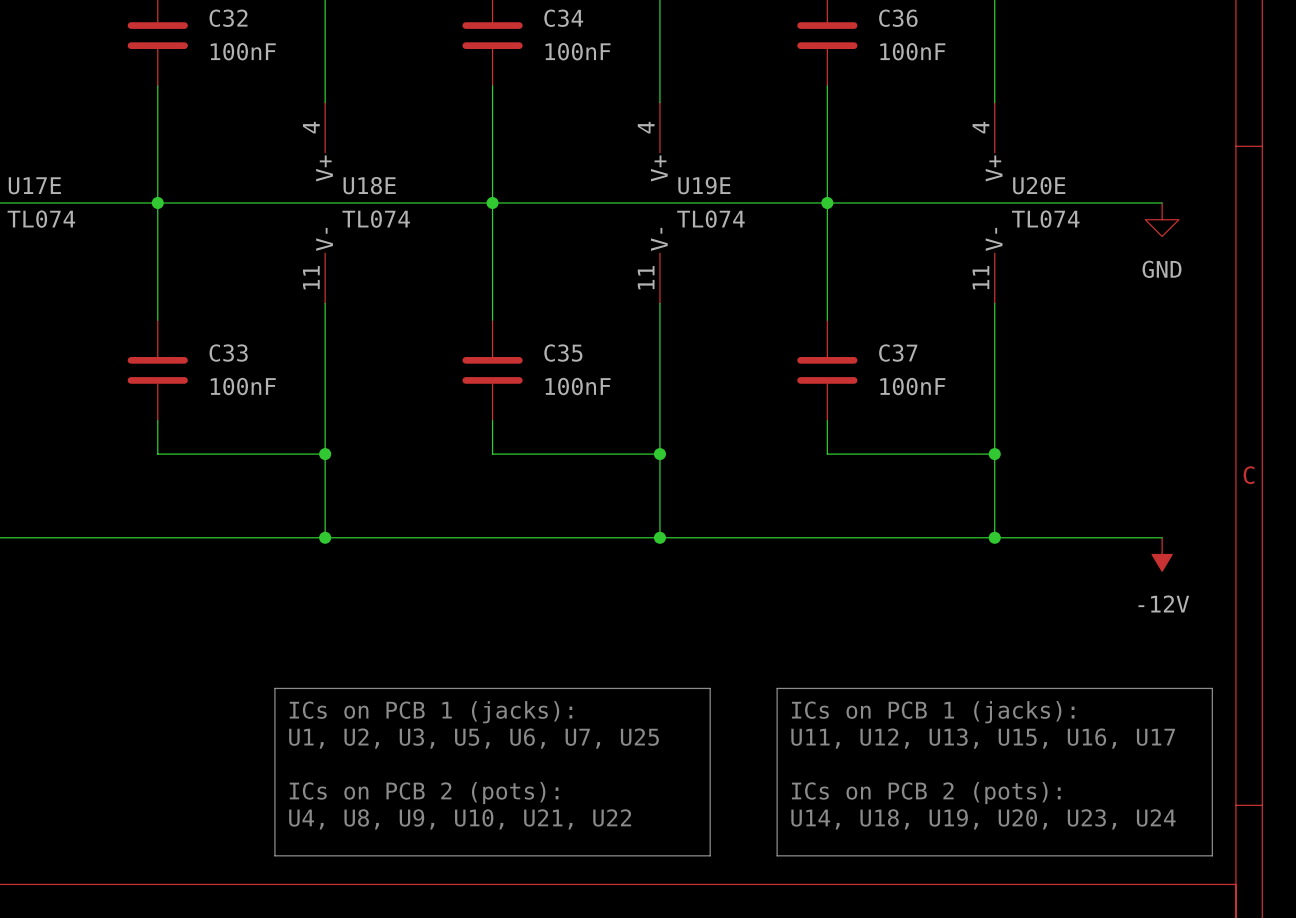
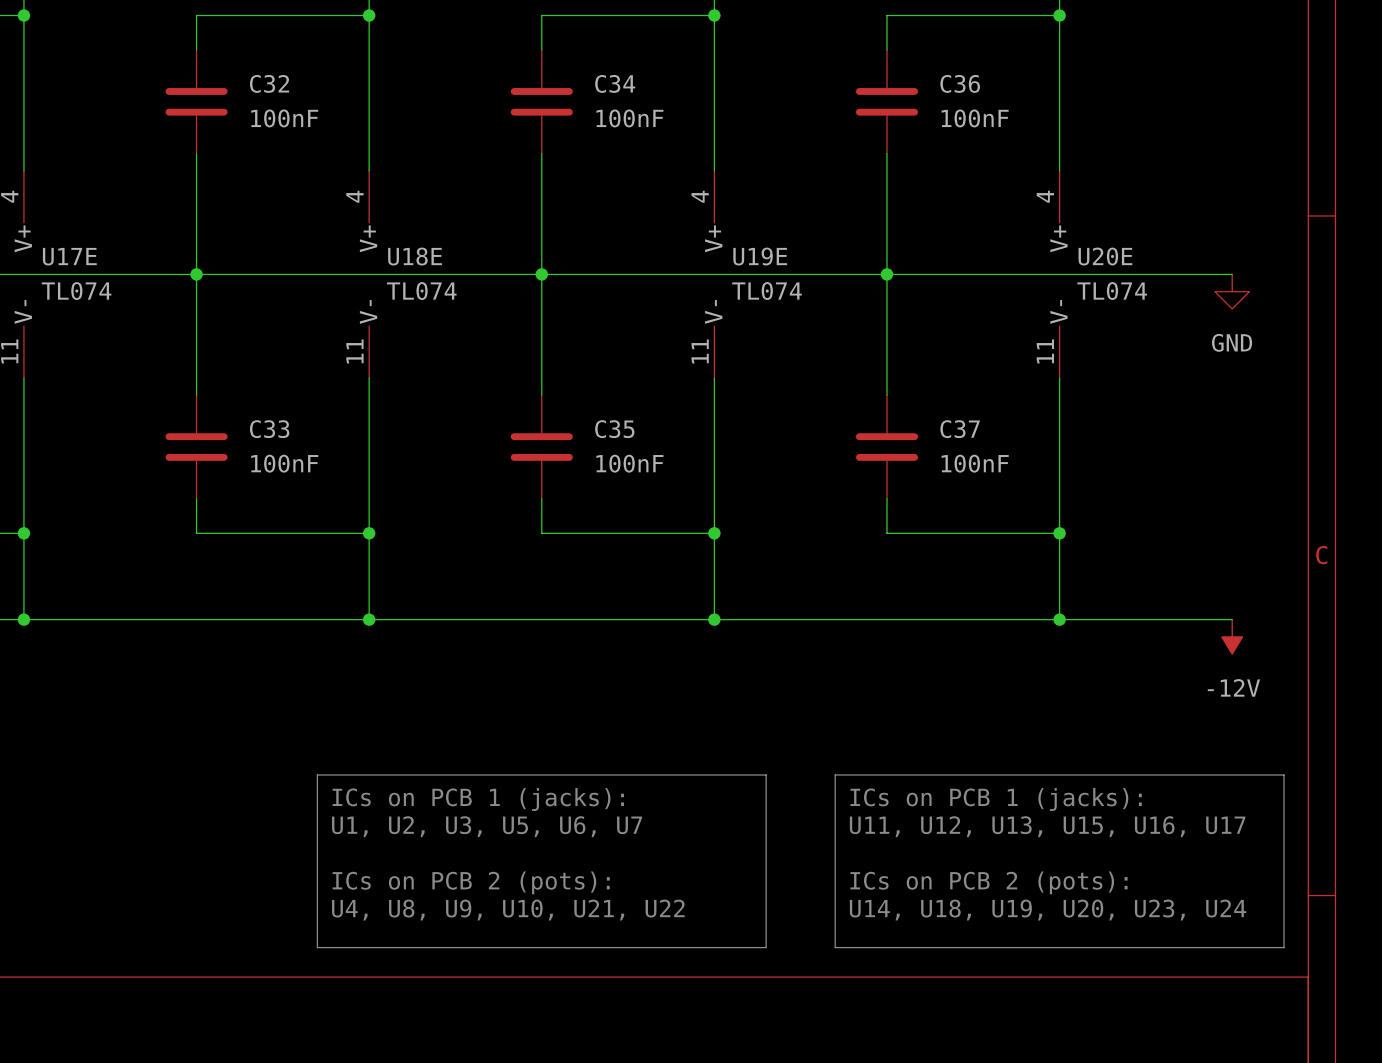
text: U1, U2, U3, U5, U6, U7, U25 (474, 738) -> U1, U2, U3, U5, U6, U7 (487, 826)

